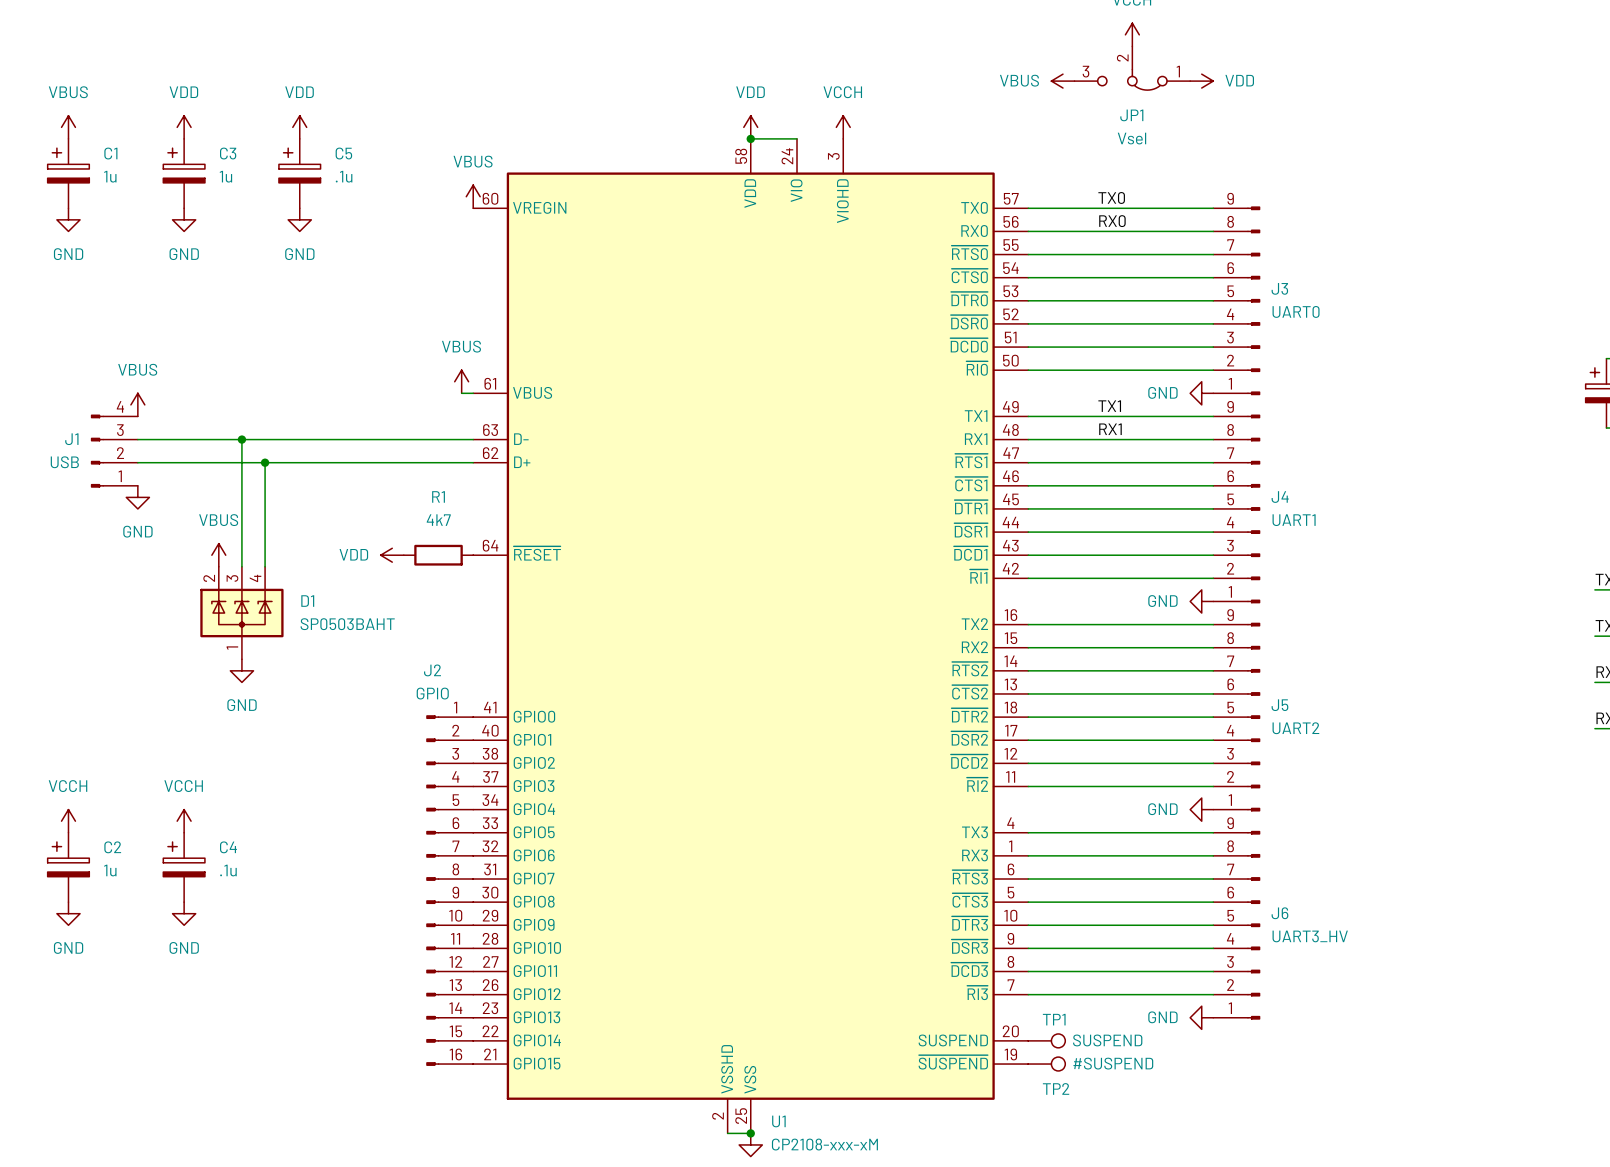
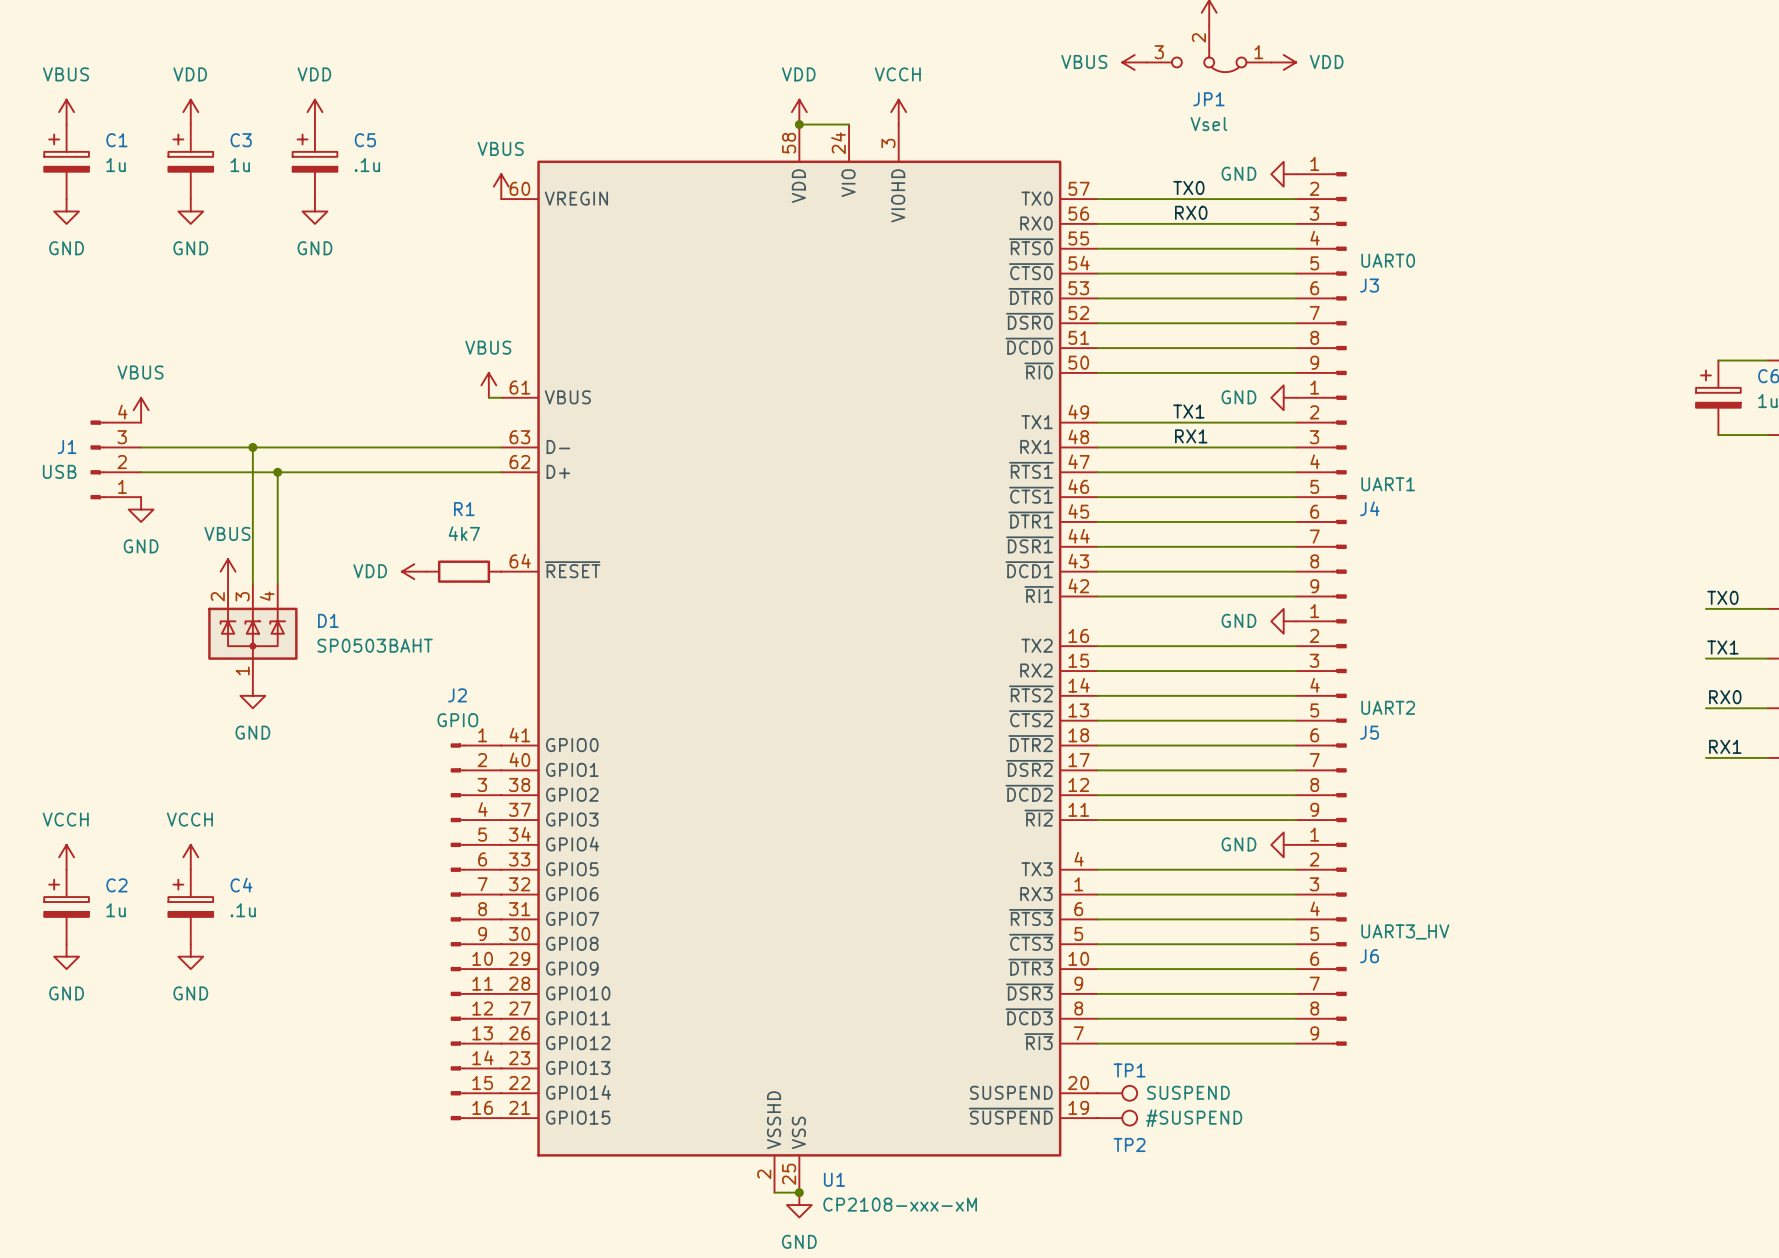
power symbol: none -> GND (1283, 174)
J3 flip: as is (1253, 300) -> up-down (1339, 273)
J4 flip: as is (1253, 508) -> up-down (1339, 497)
J5 flip: as is (1253, 717) -> up-down (1339, 720)
J6 flip: as is (1253, 925) -> up-down (1339, 944)
power symbol: GND (1201, 1017) -> none

